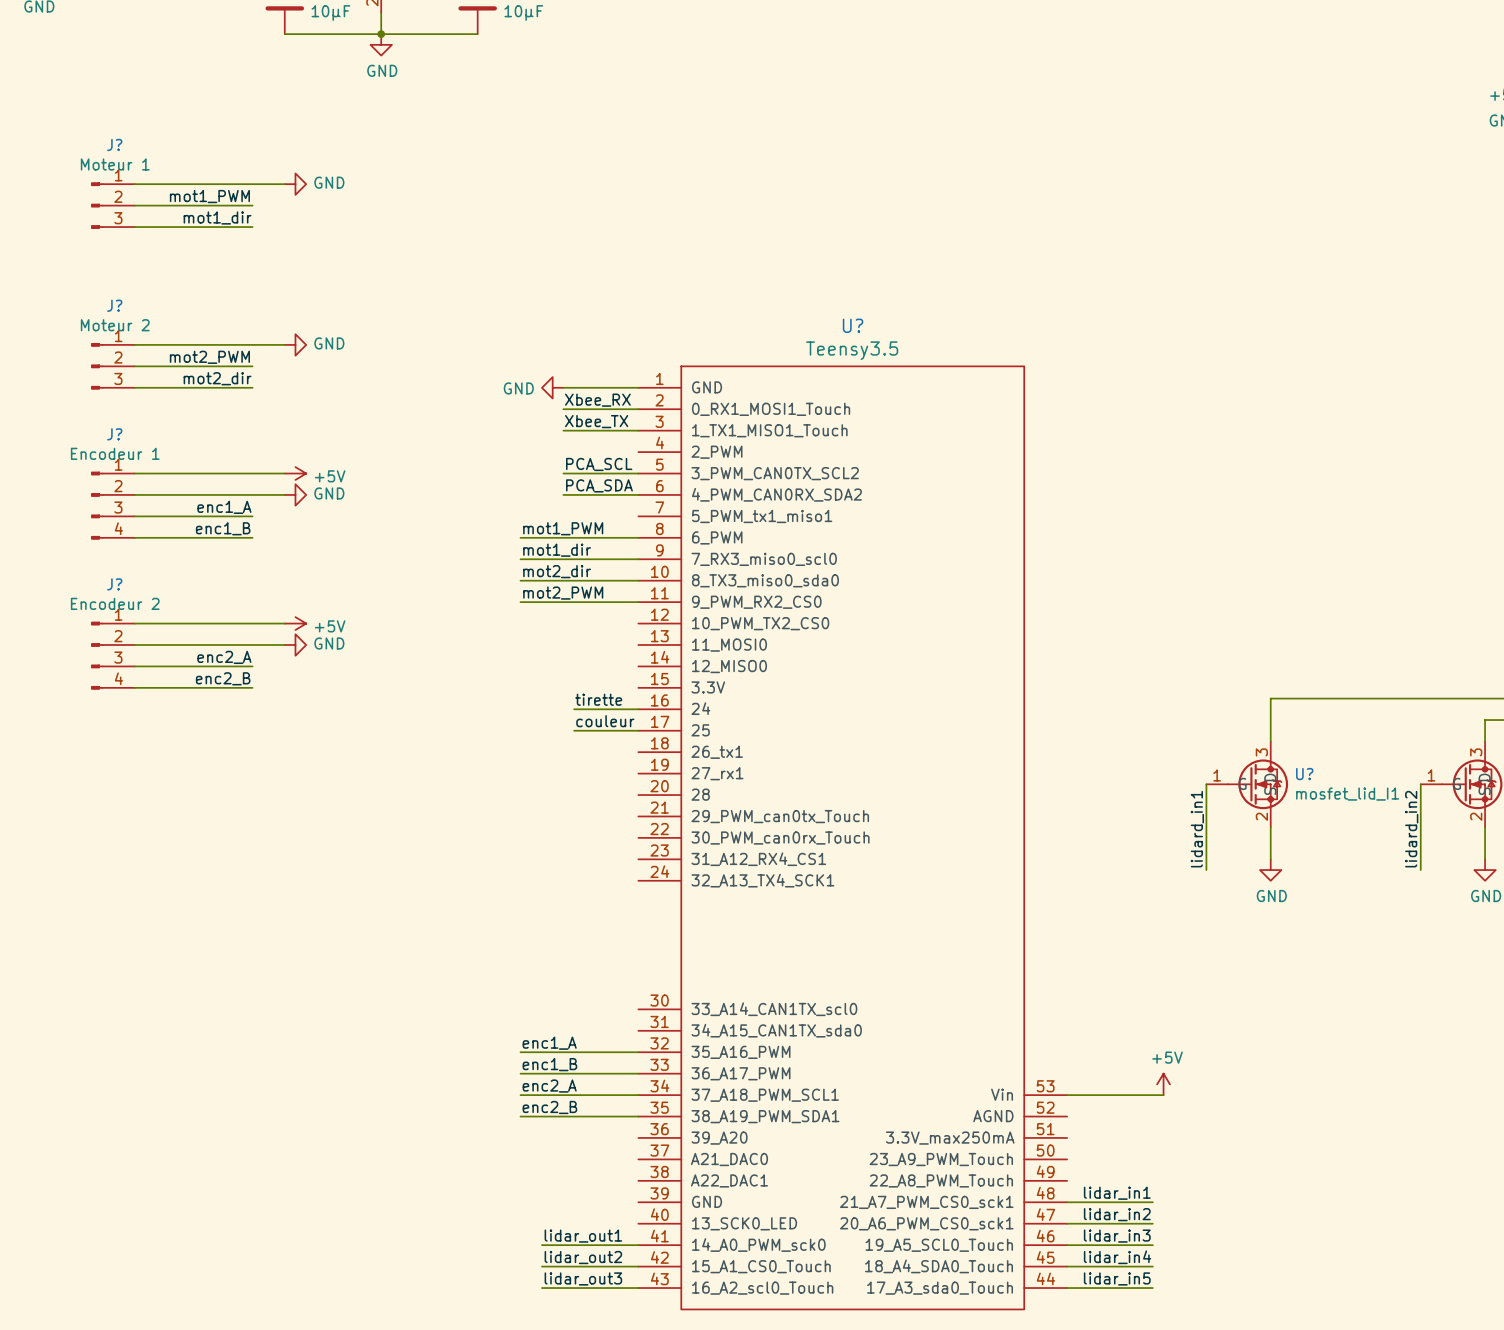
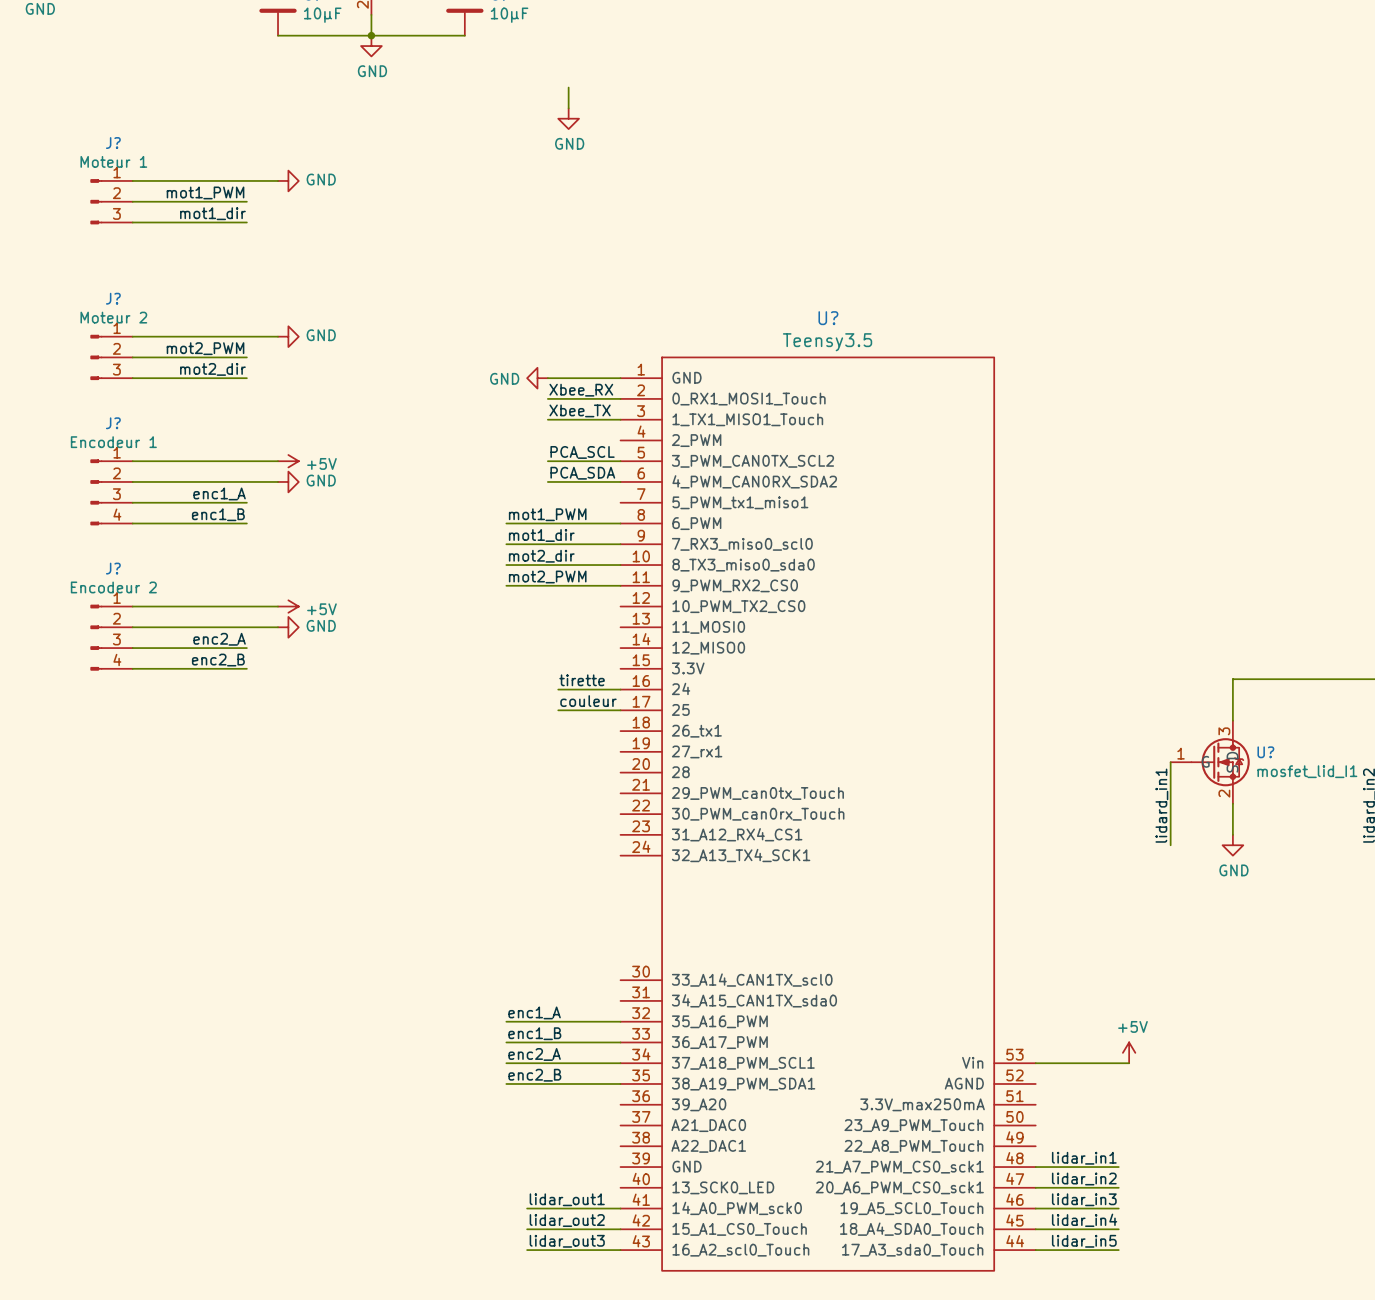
wire: none -> (568, 87) (568, 108)
power symbol: none -> GND (568, 118)

